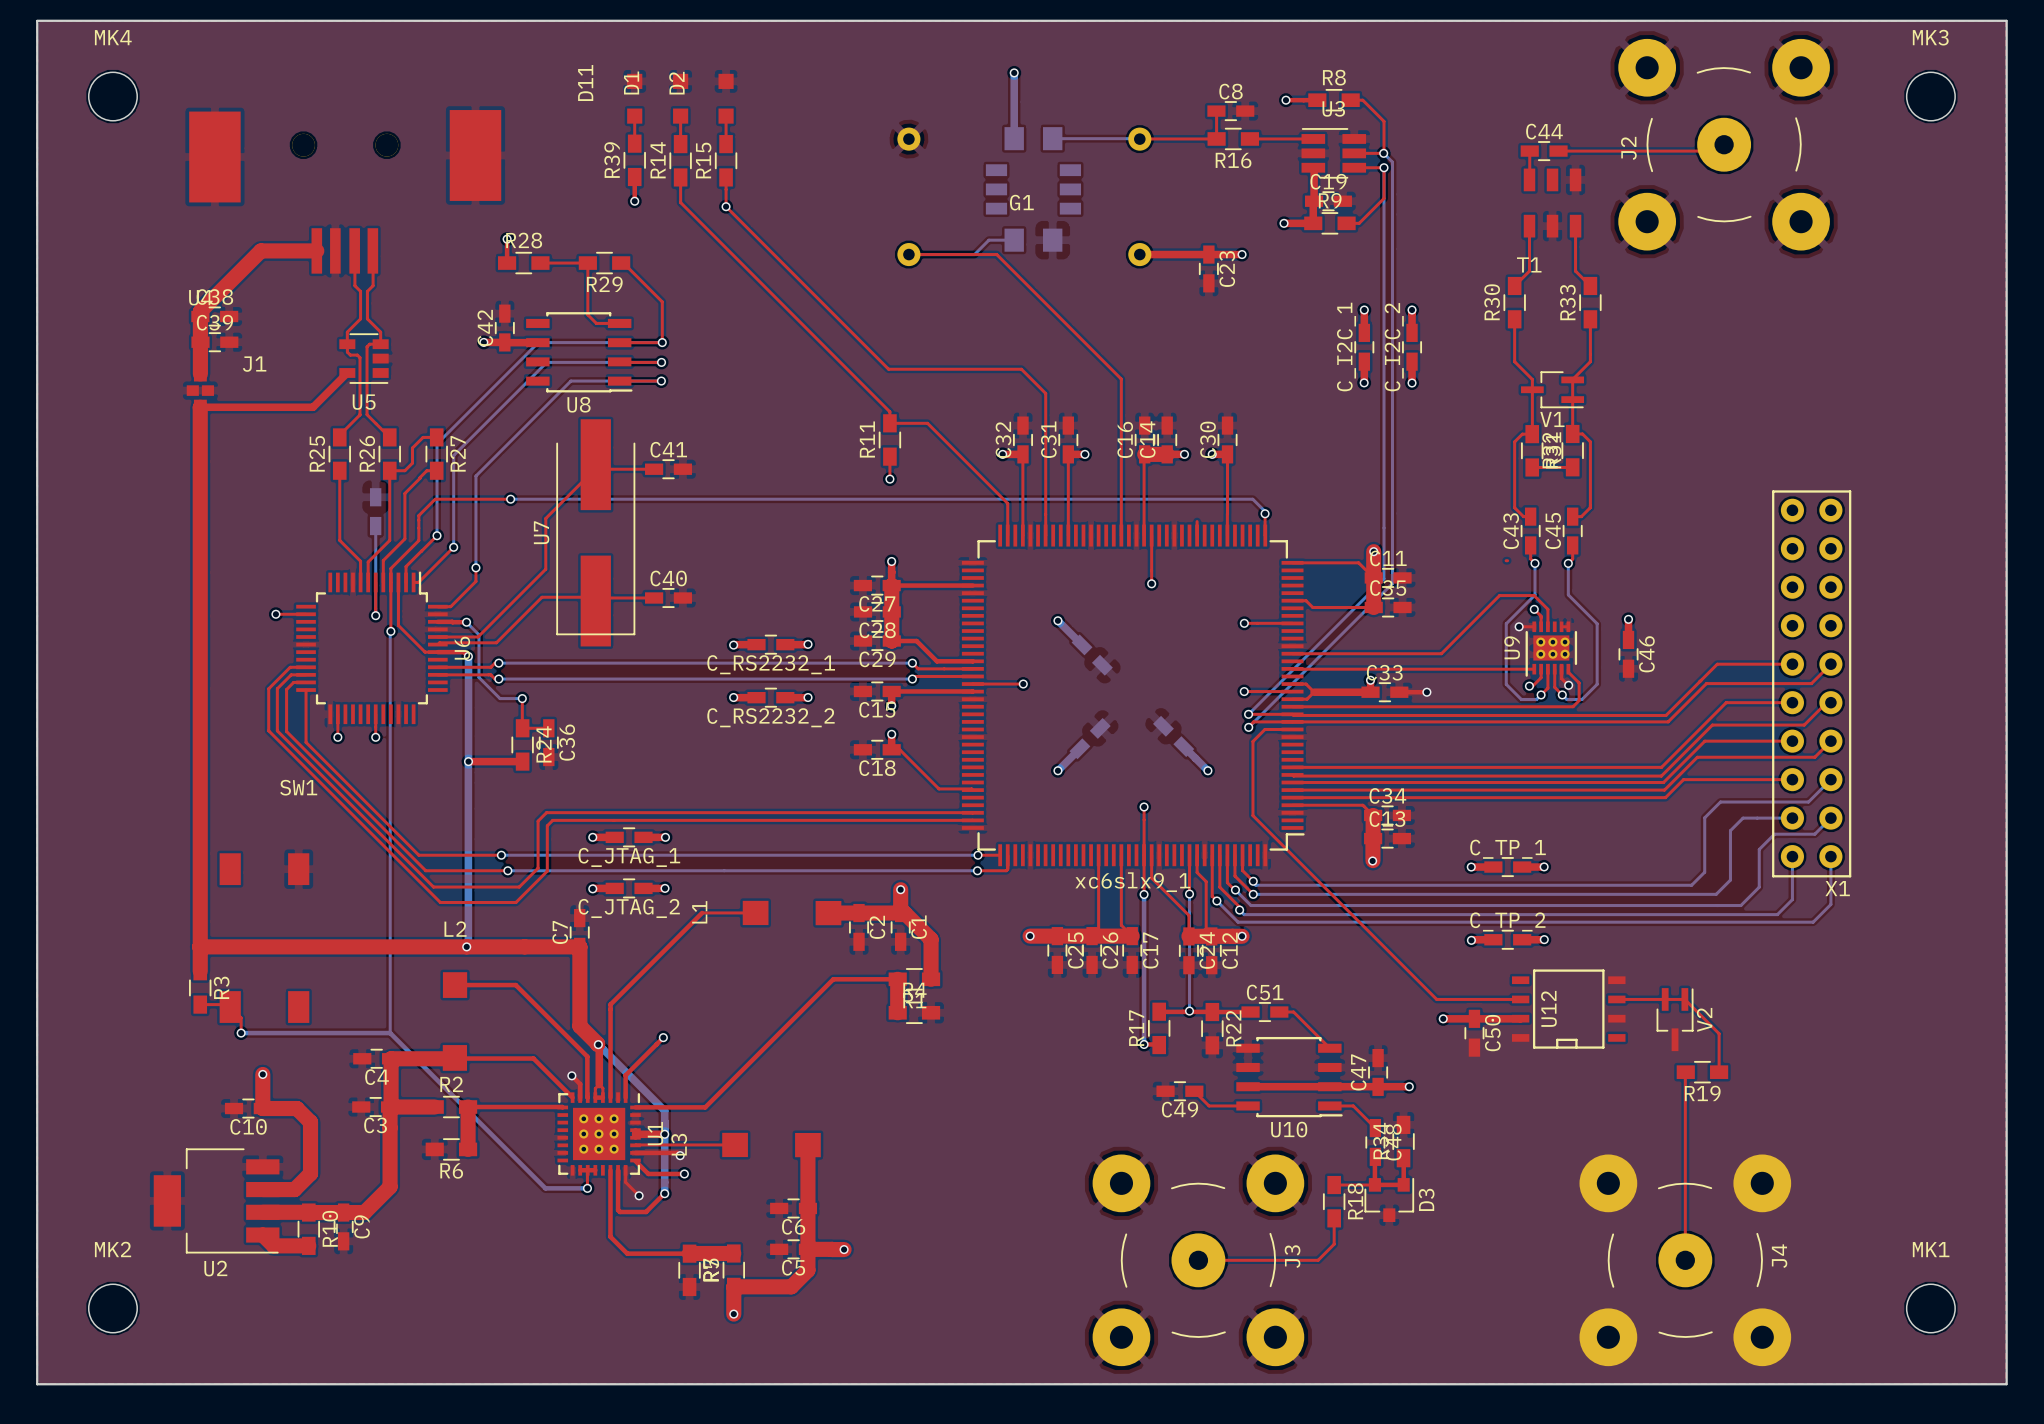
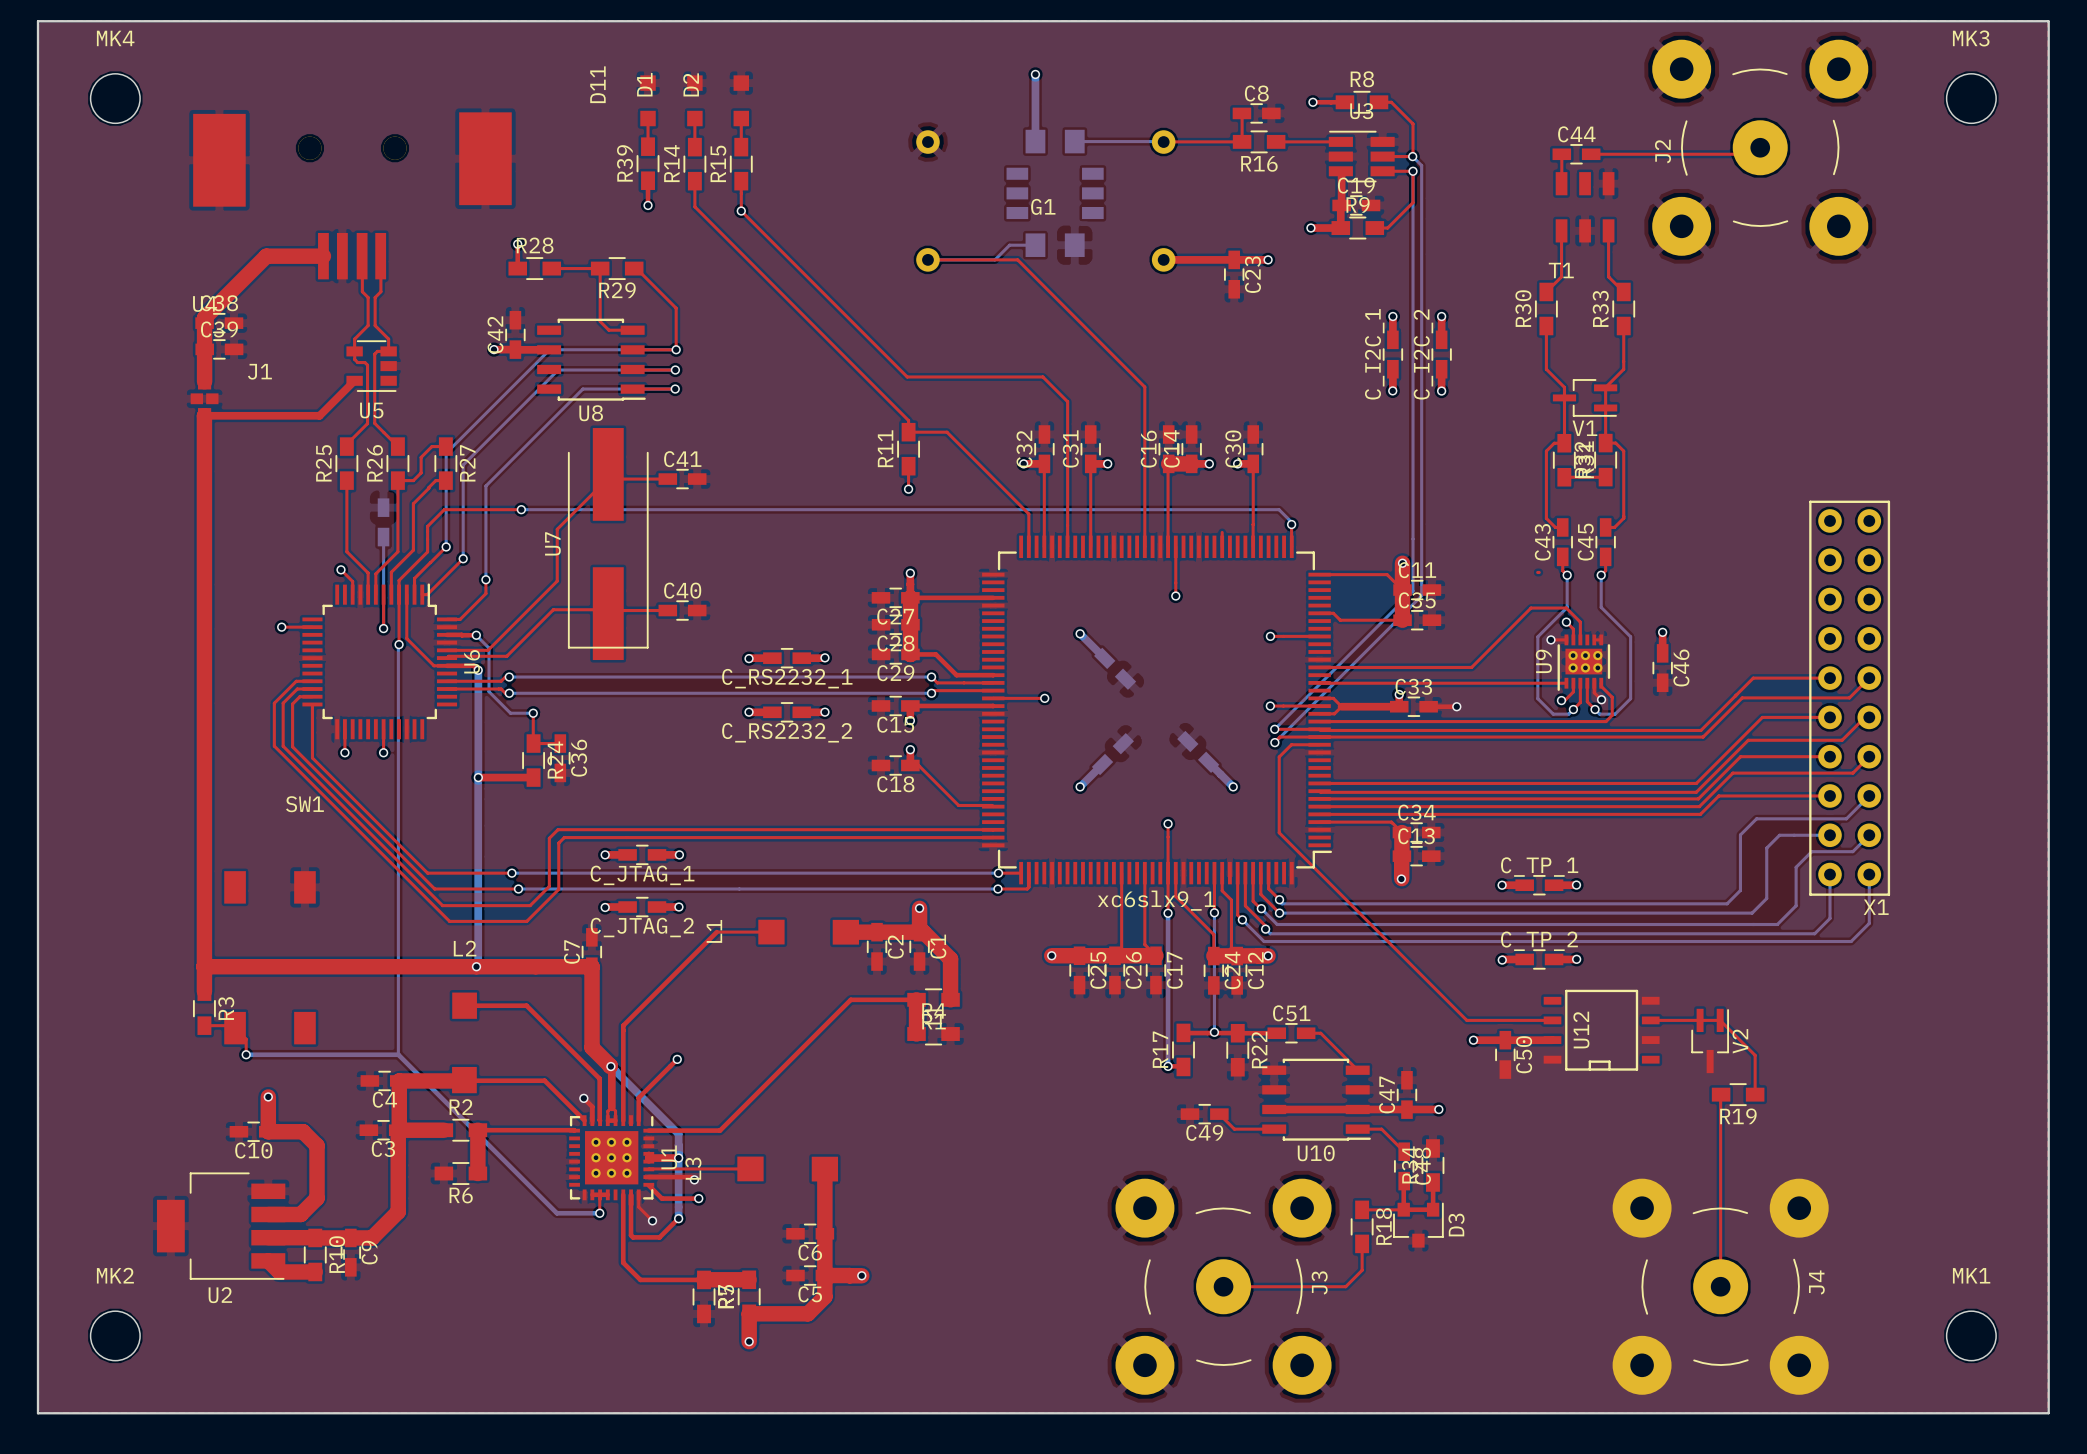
top track: none -> (341, 569) (352, 581) (352, 594)
via: none -> (341, 569)

